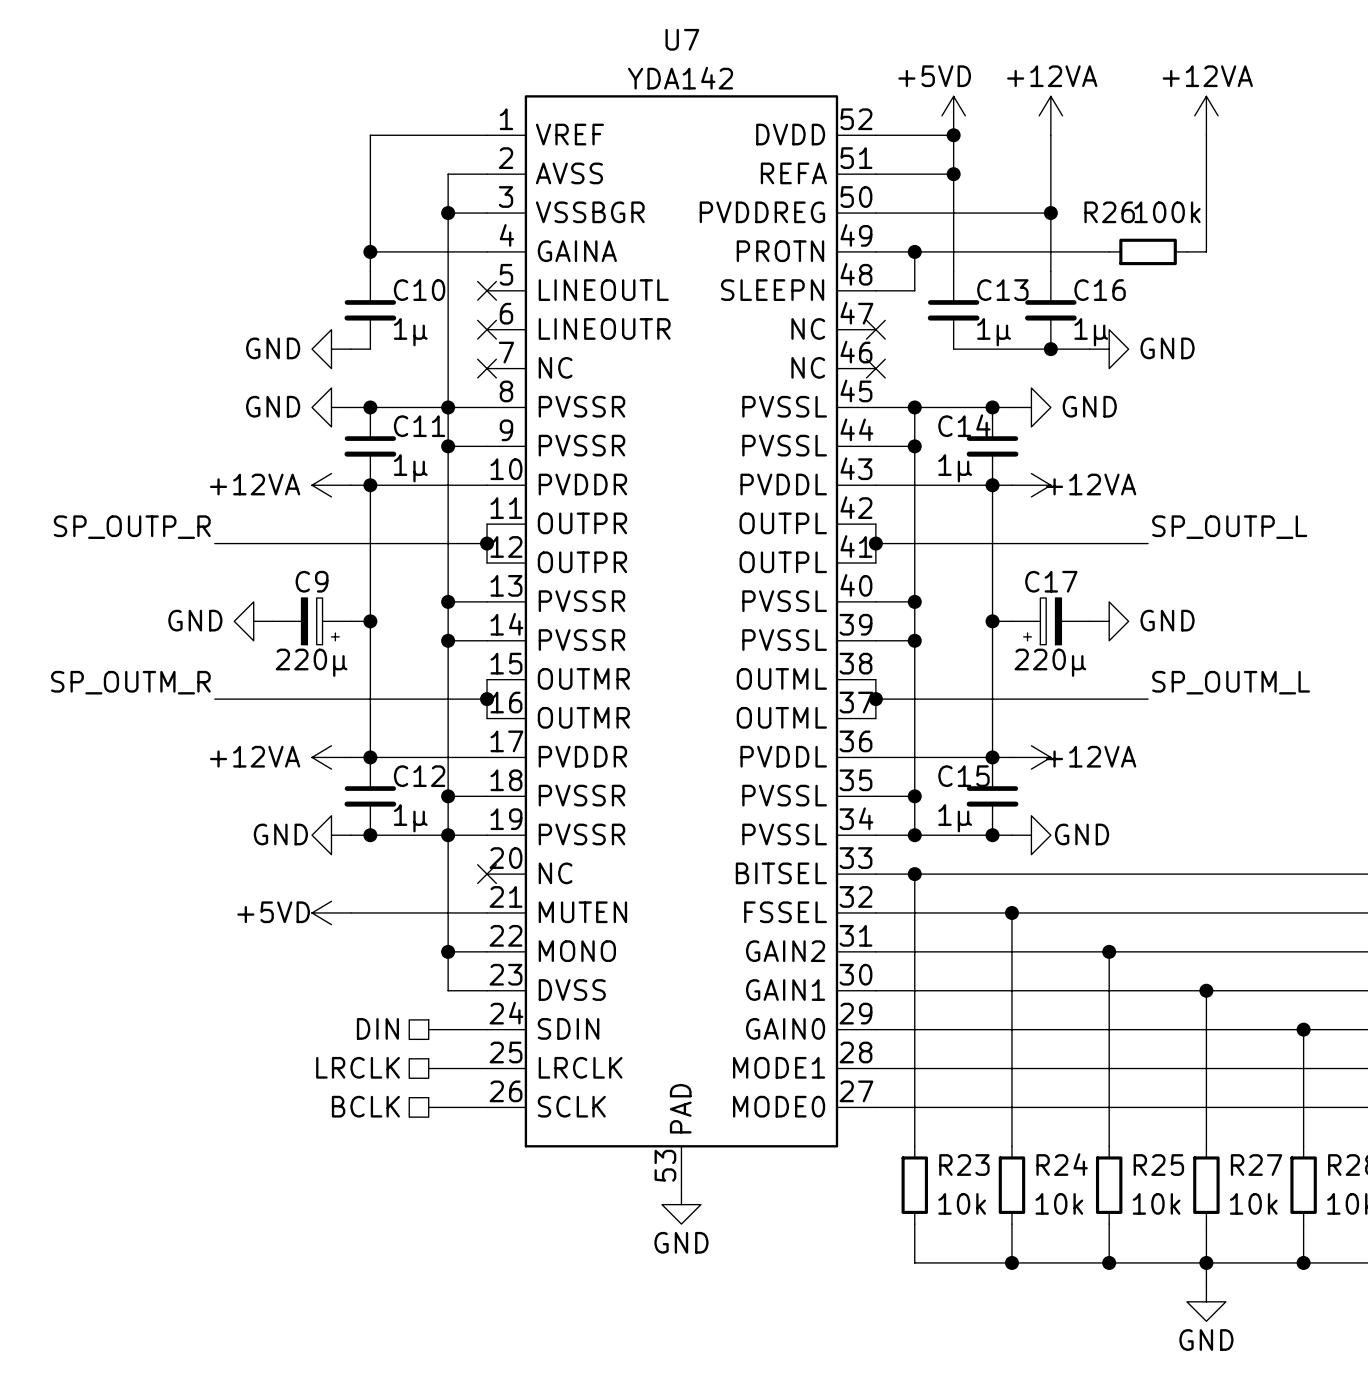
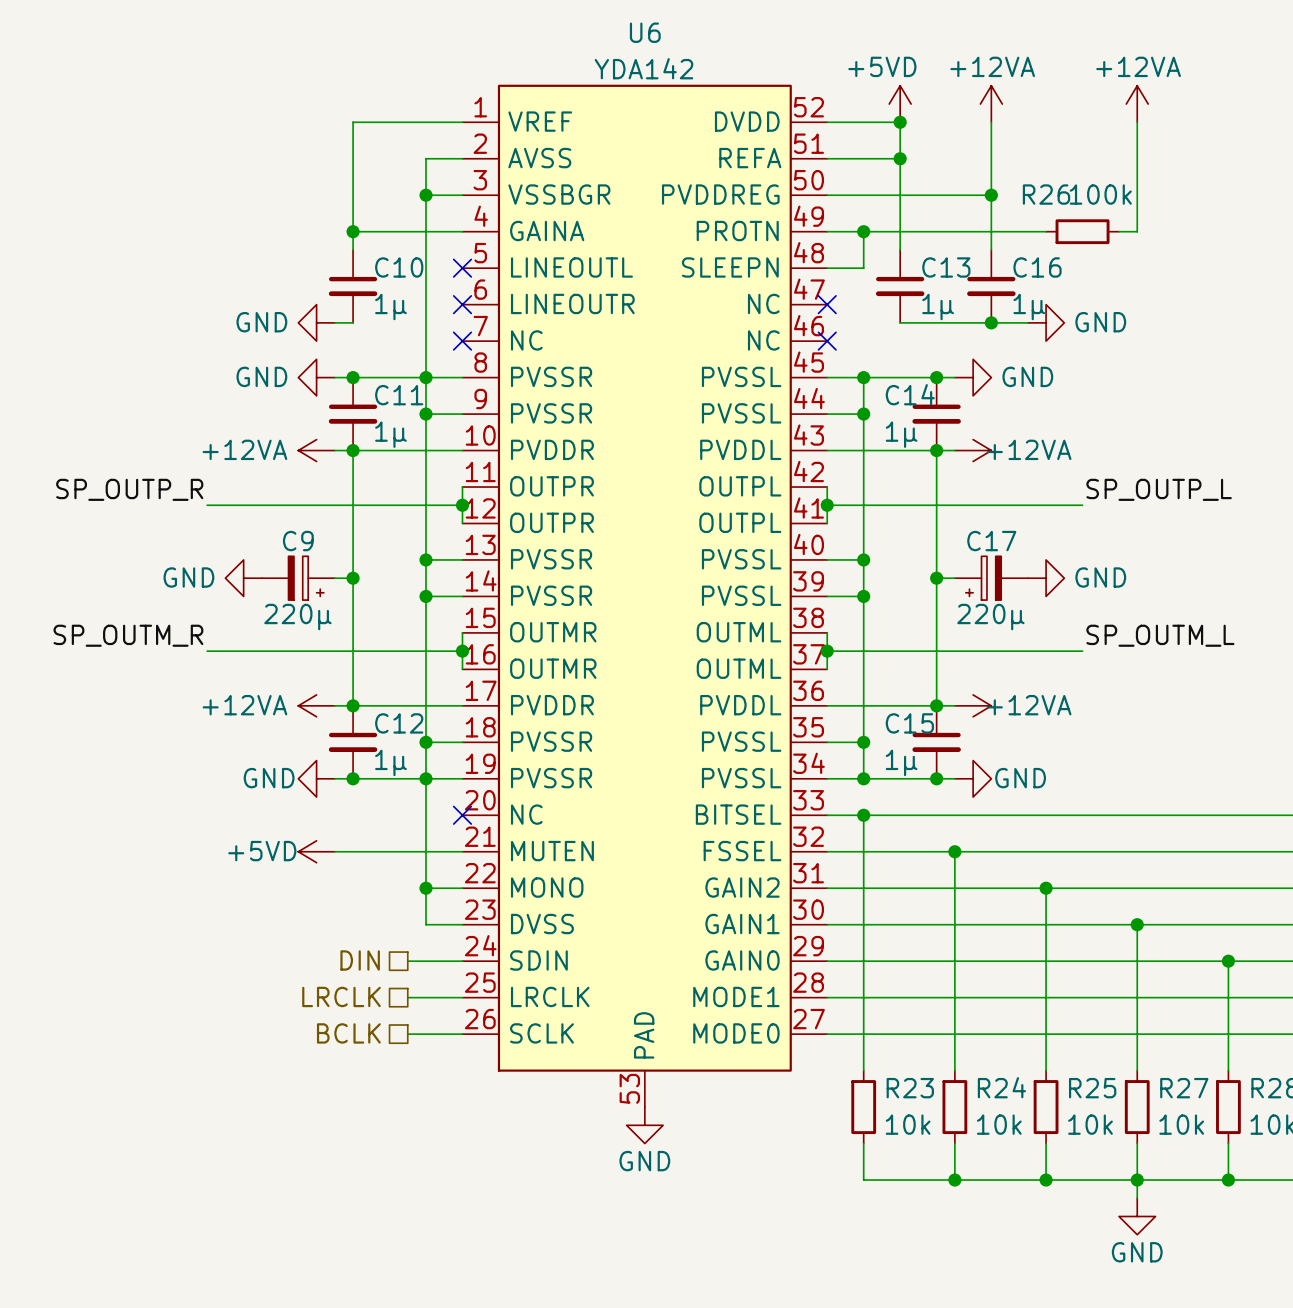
U7 name: U7 (682, 39) -> U6 (645, 32)

